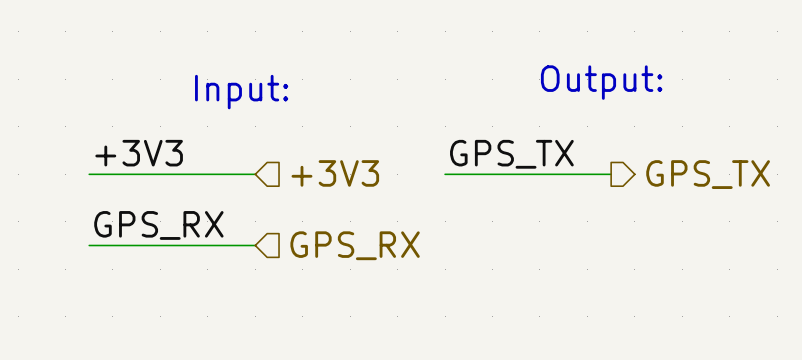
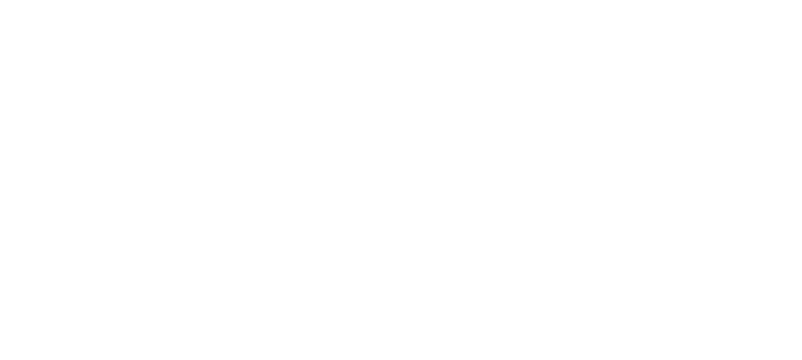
text: Output: (601, 82) -> none
text: Input: (241, 92) -> none
label: +3V3 (139, 153) -> none
label: GPS_TX (511, 154) -> none
hierarchical label: +3V3 (335, 173) -> none
wire: (89, 174) (255, 174) -> none
wire: (445, 174) (611, 174) -> none
hierarchical label: GPS_TX (708, 174) -> none
label: GPS_RX (158, 225) -> none
wire: (89, 245) (255, 245) -> none
hierarchical label: GPS_RX (355, 245) -> none

